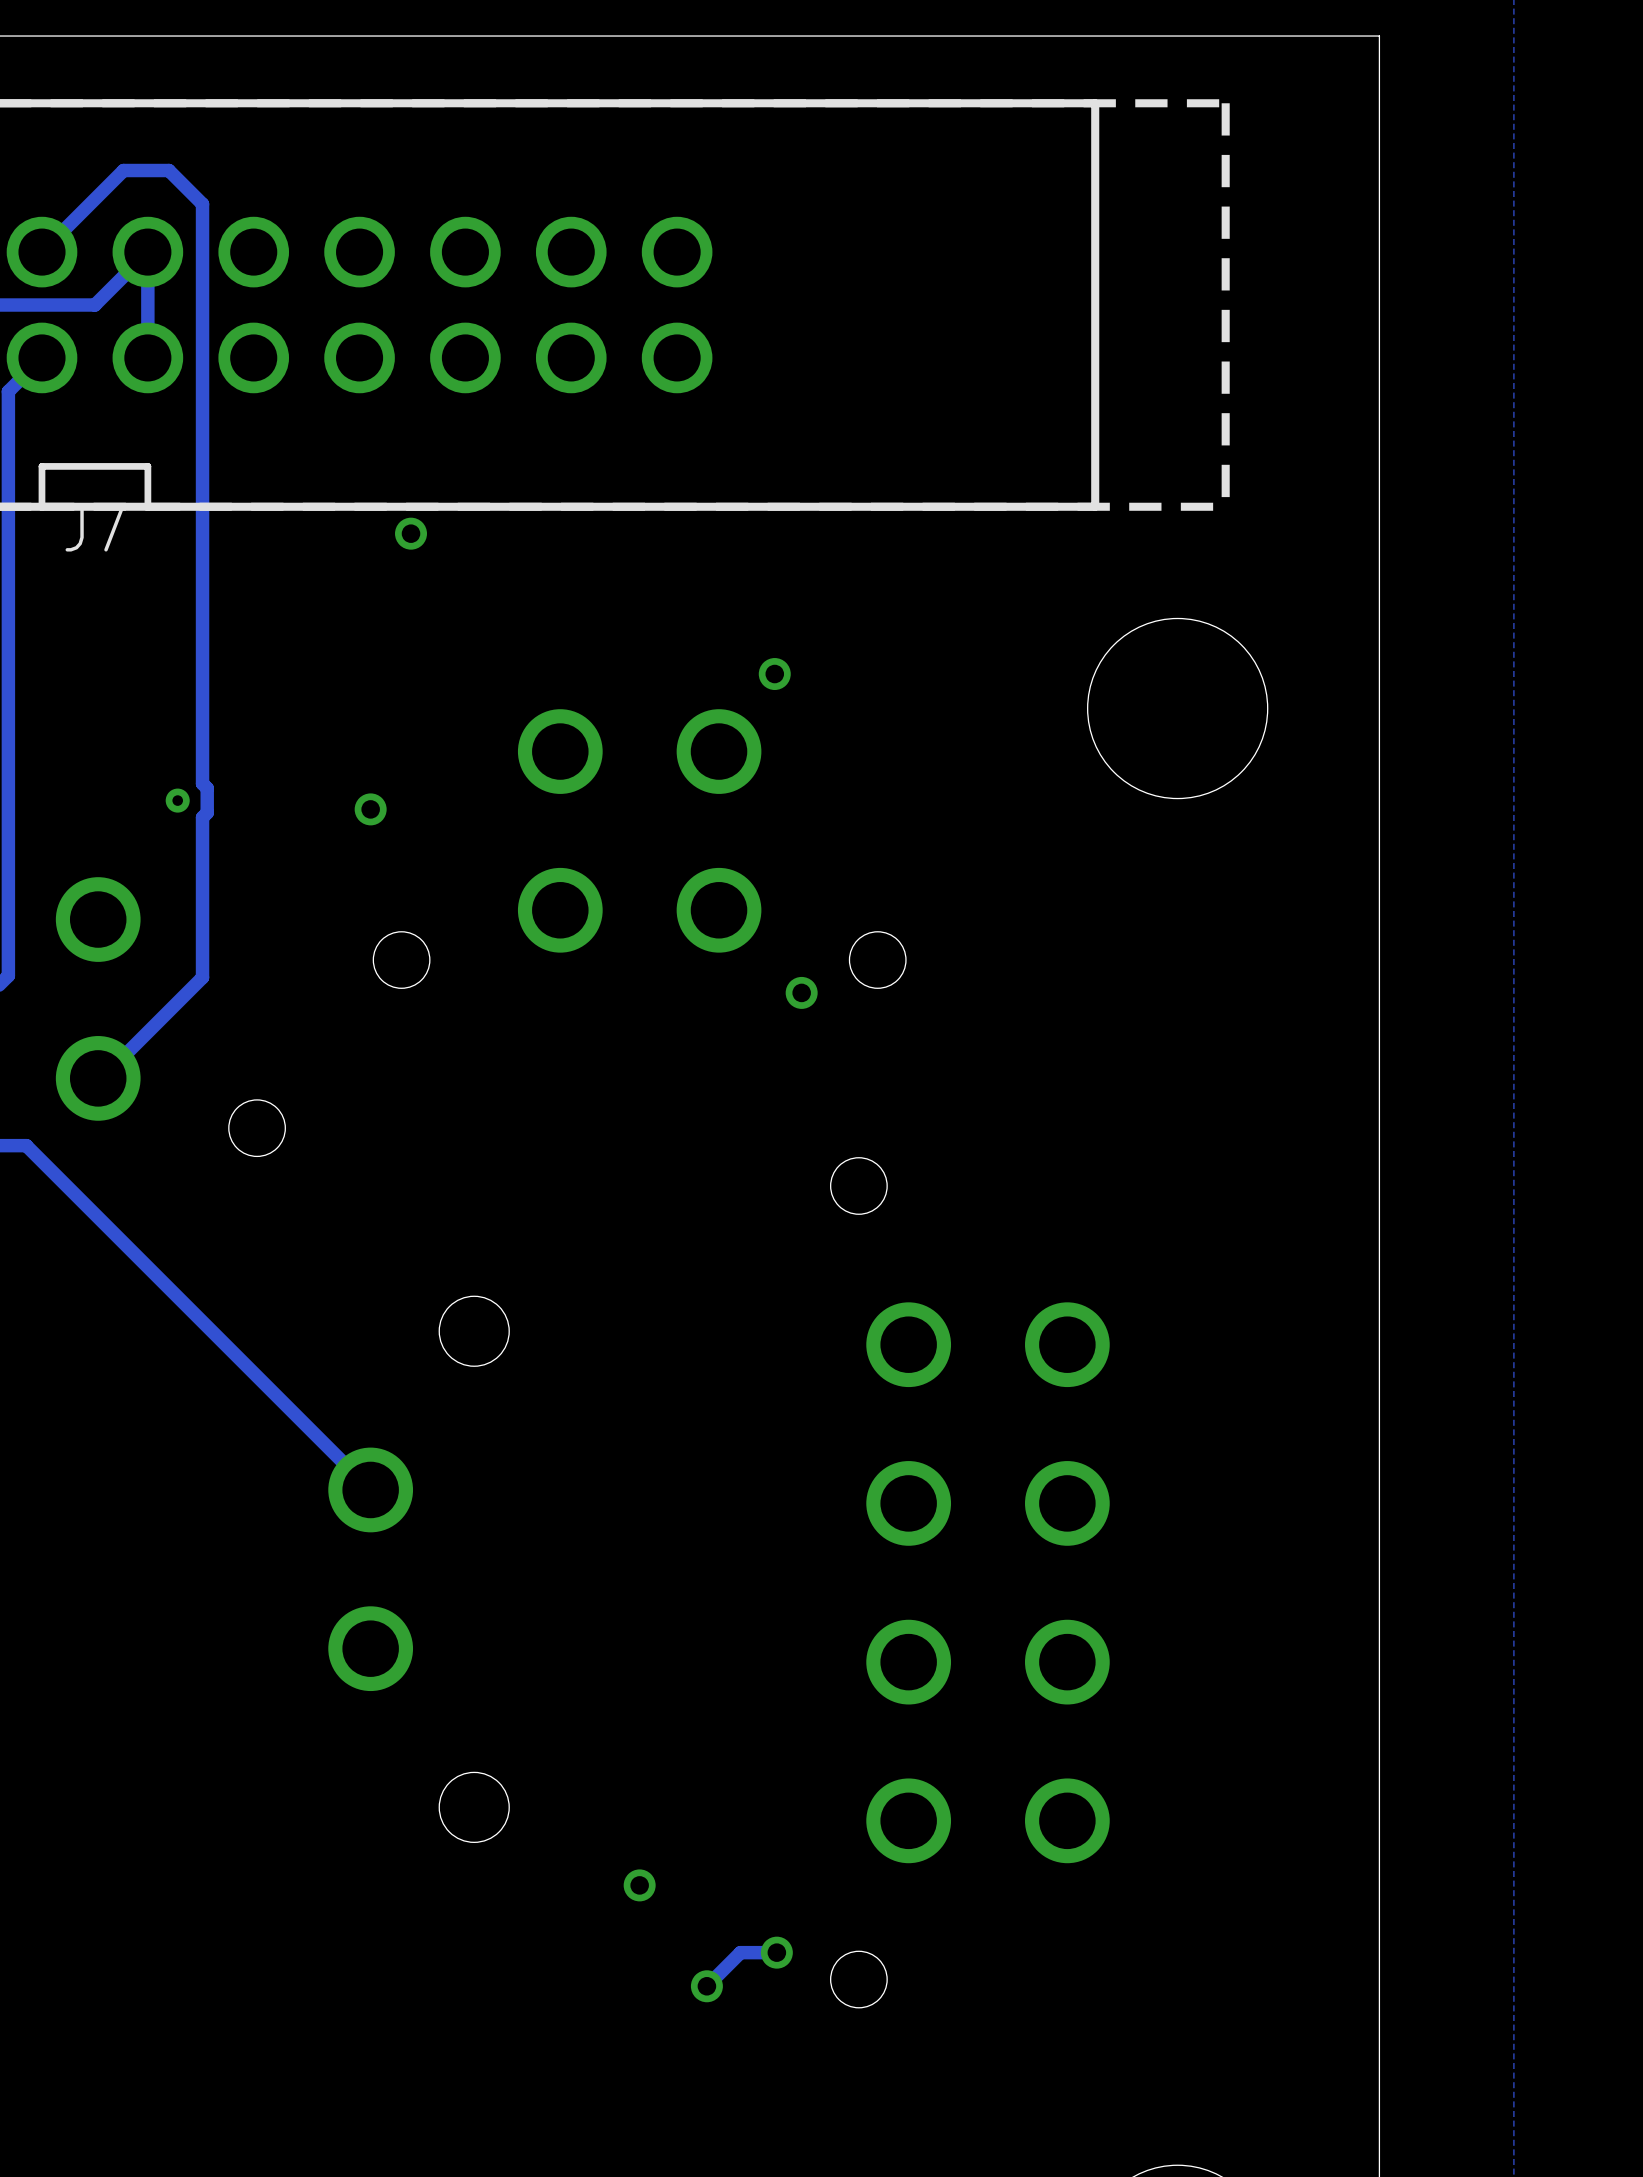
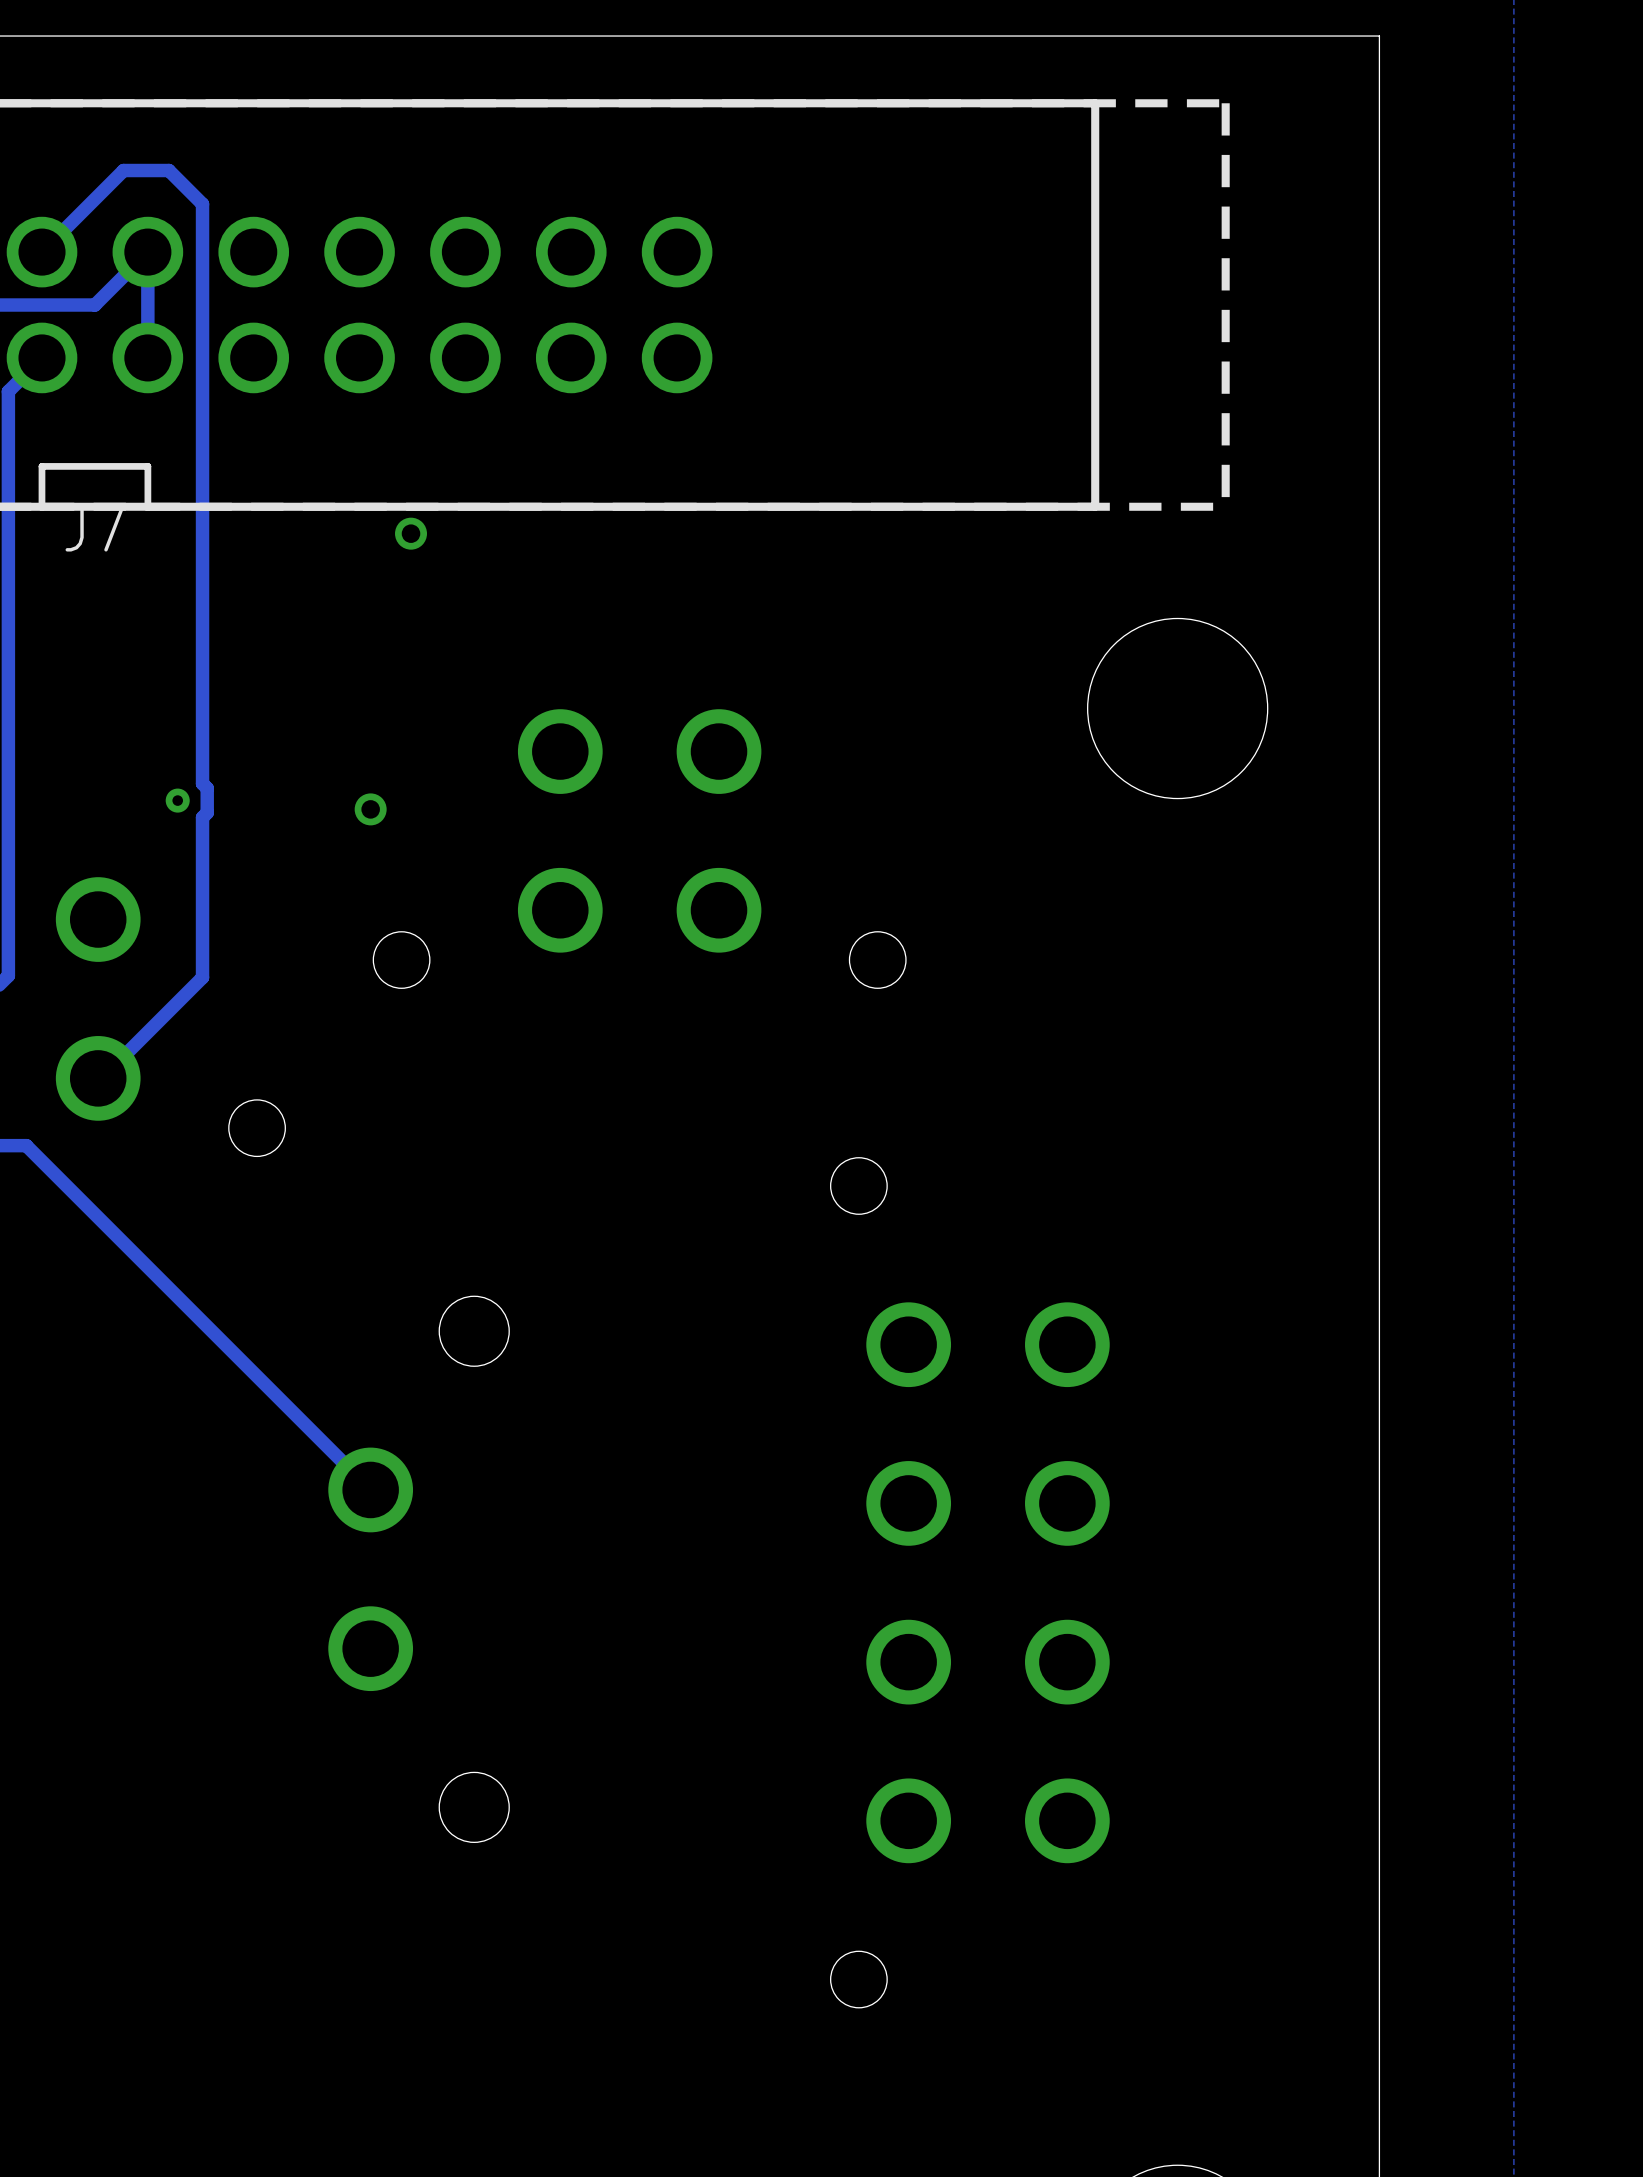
via: (774, 674) -> none
via: (801, 992) -> none
via: (639, 1885) -> none
track: (776, 1952) (740, 1952) (706, 1986) -> none
via: (776, 1952) -> none
via: (706, 1986) -> none

